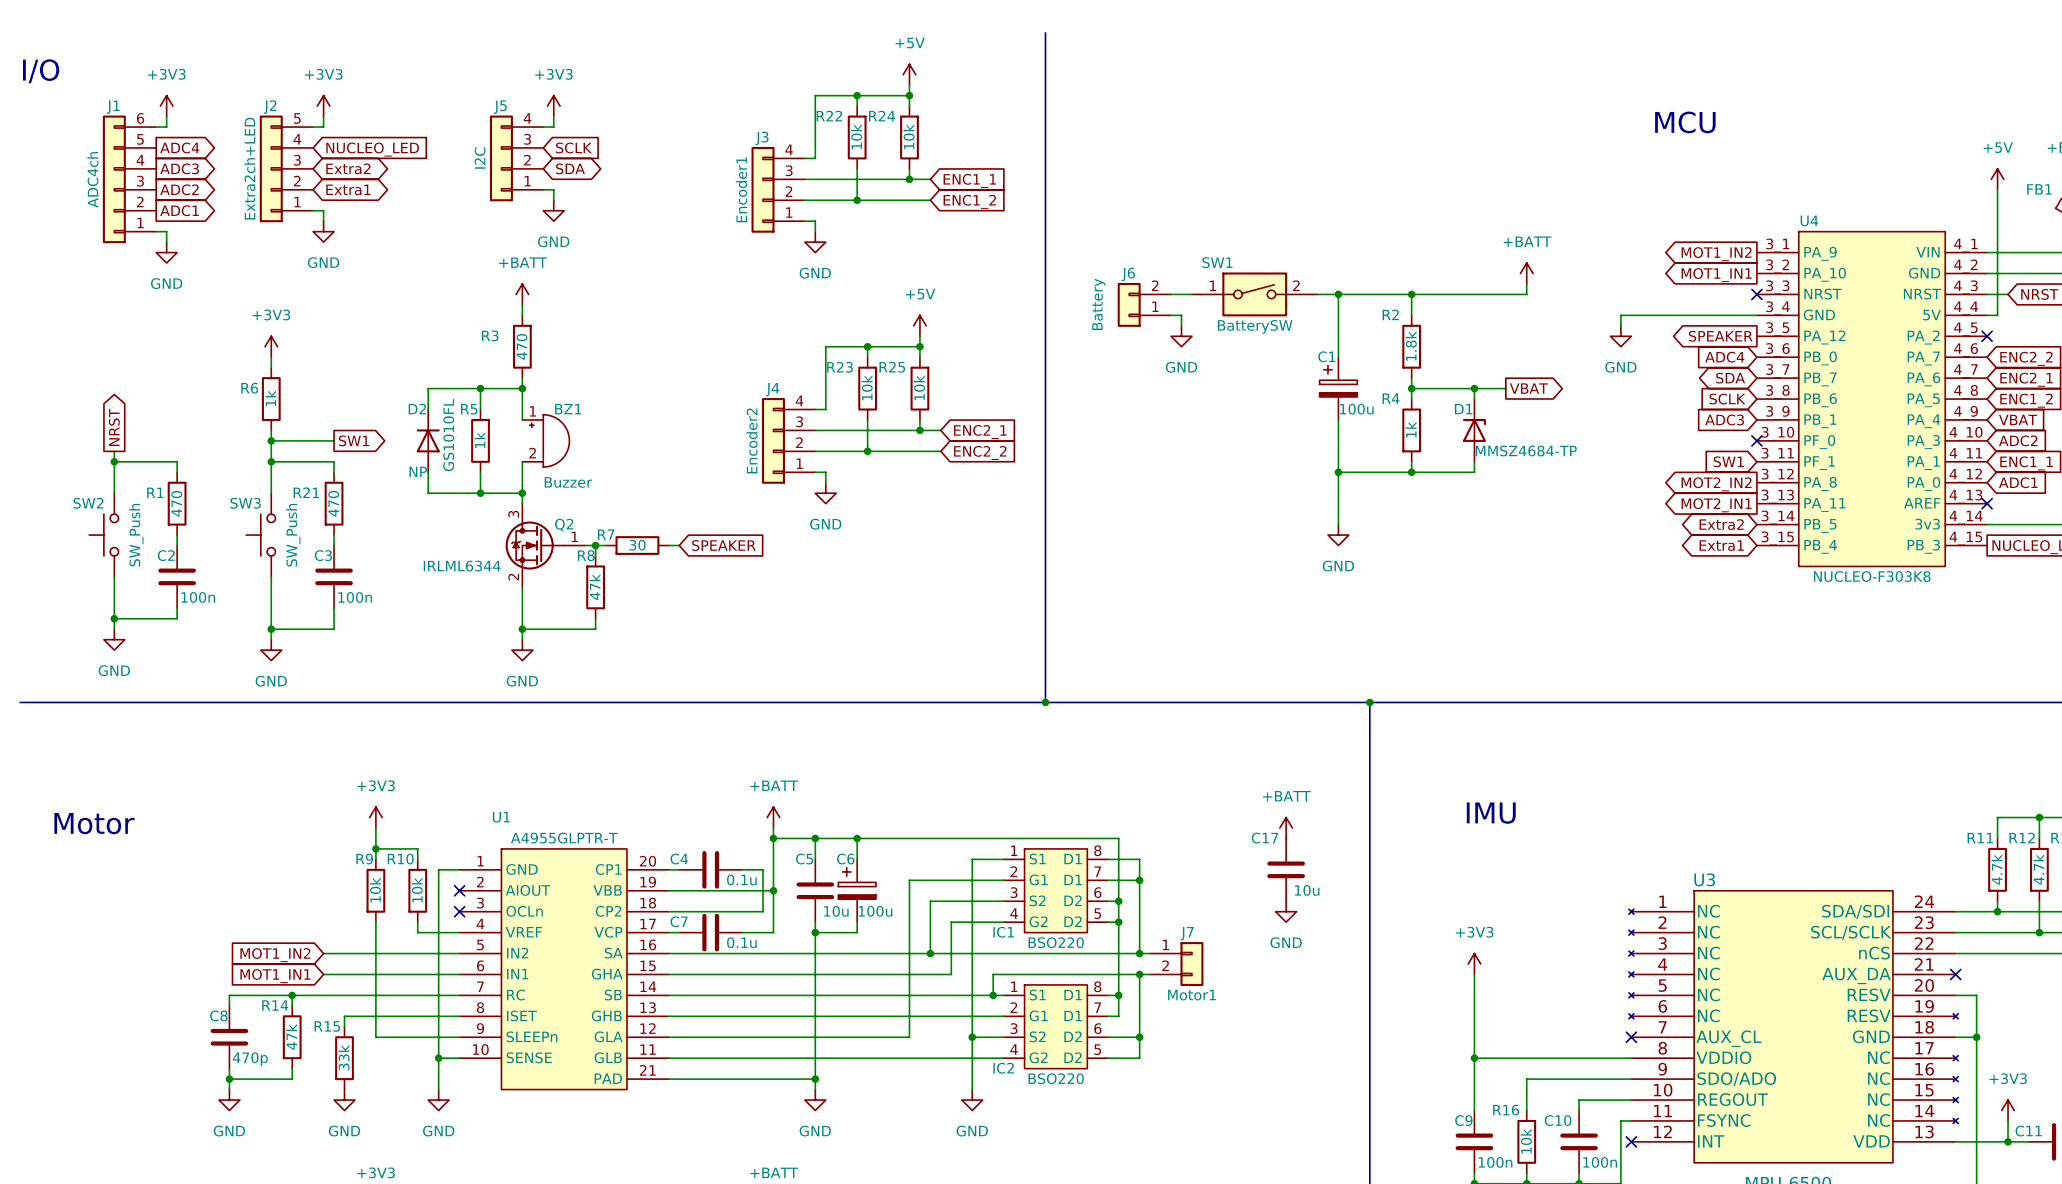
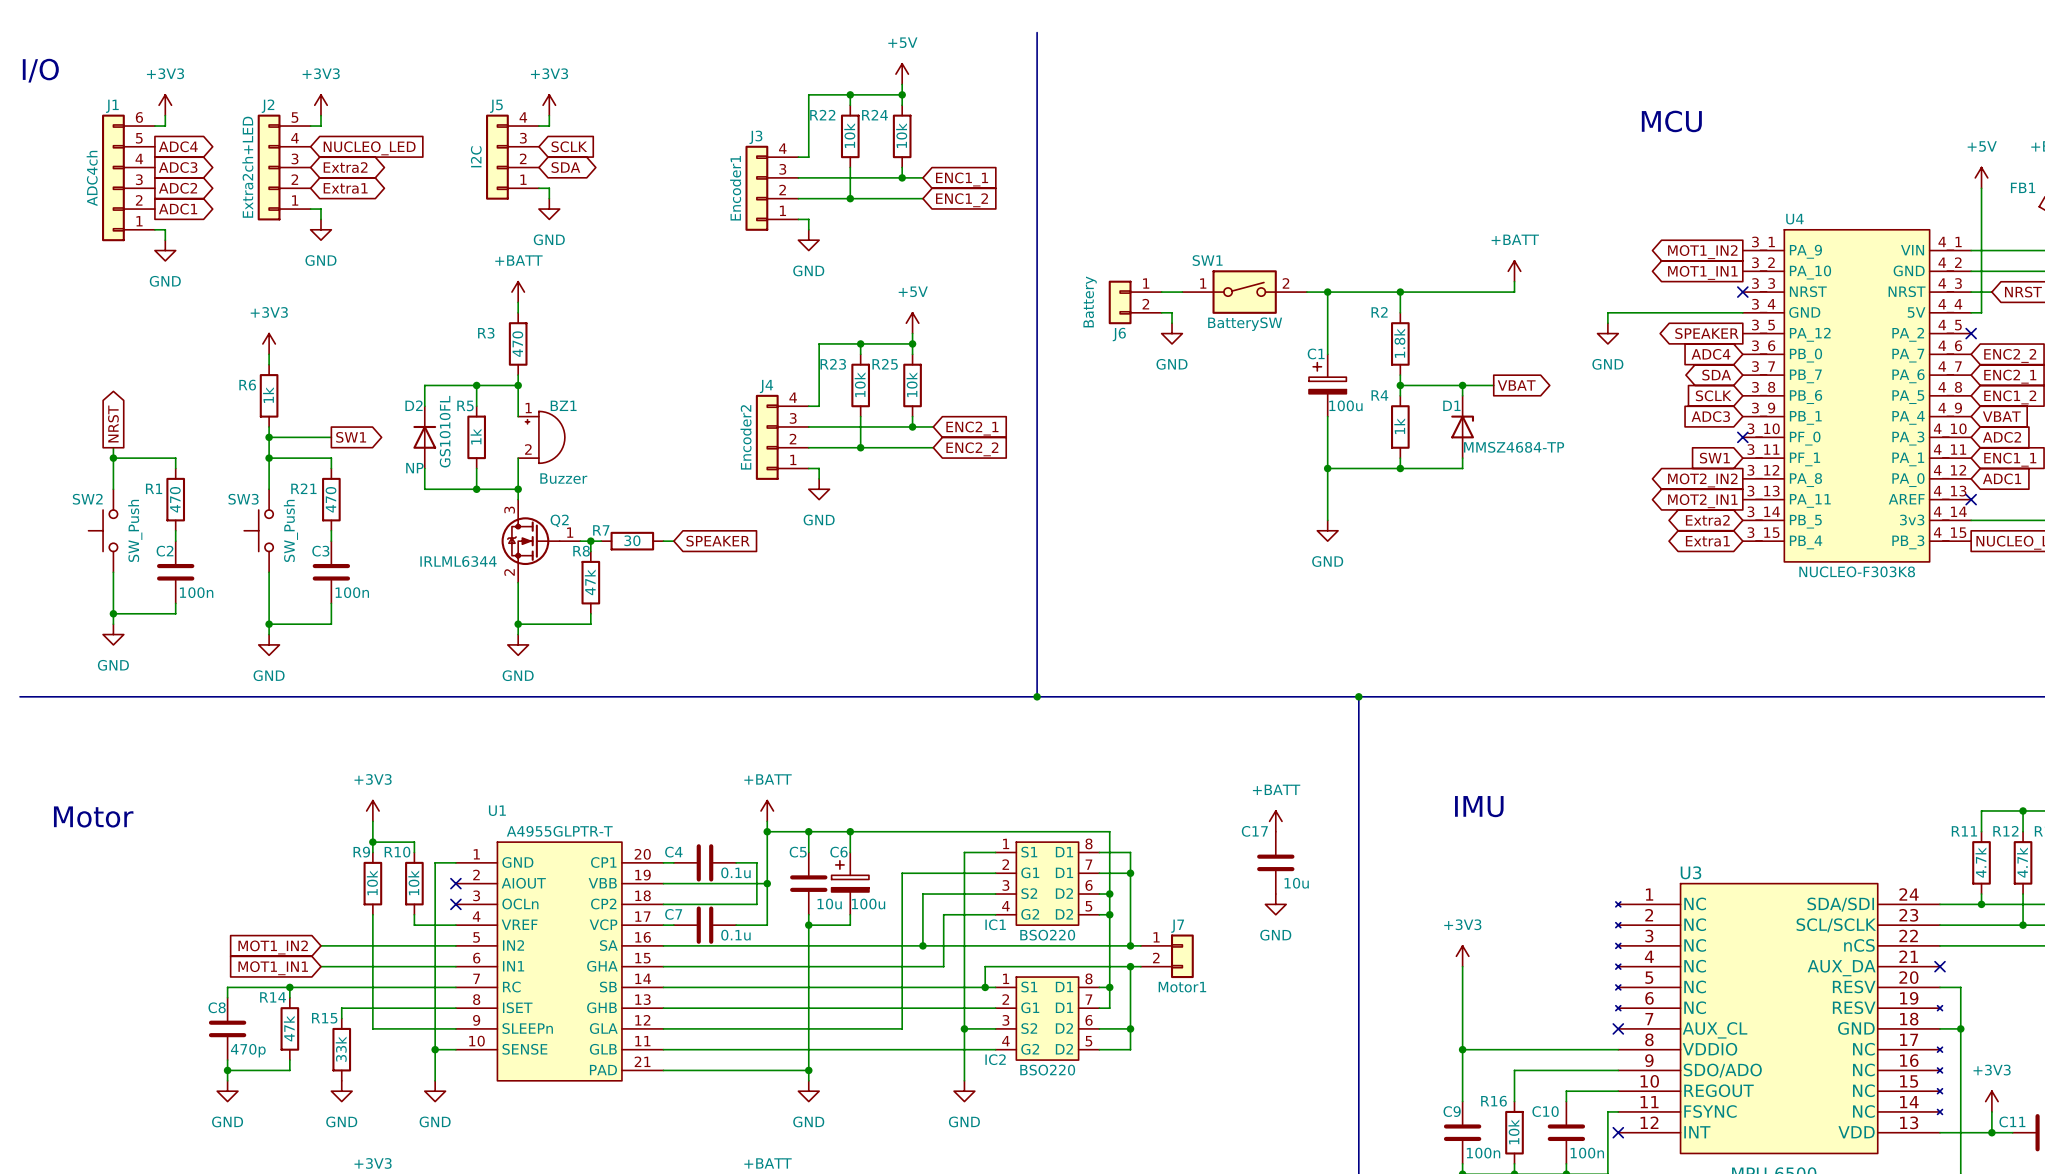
J6 flip: as is (1129, 304) -> up-down (1120, 302)

